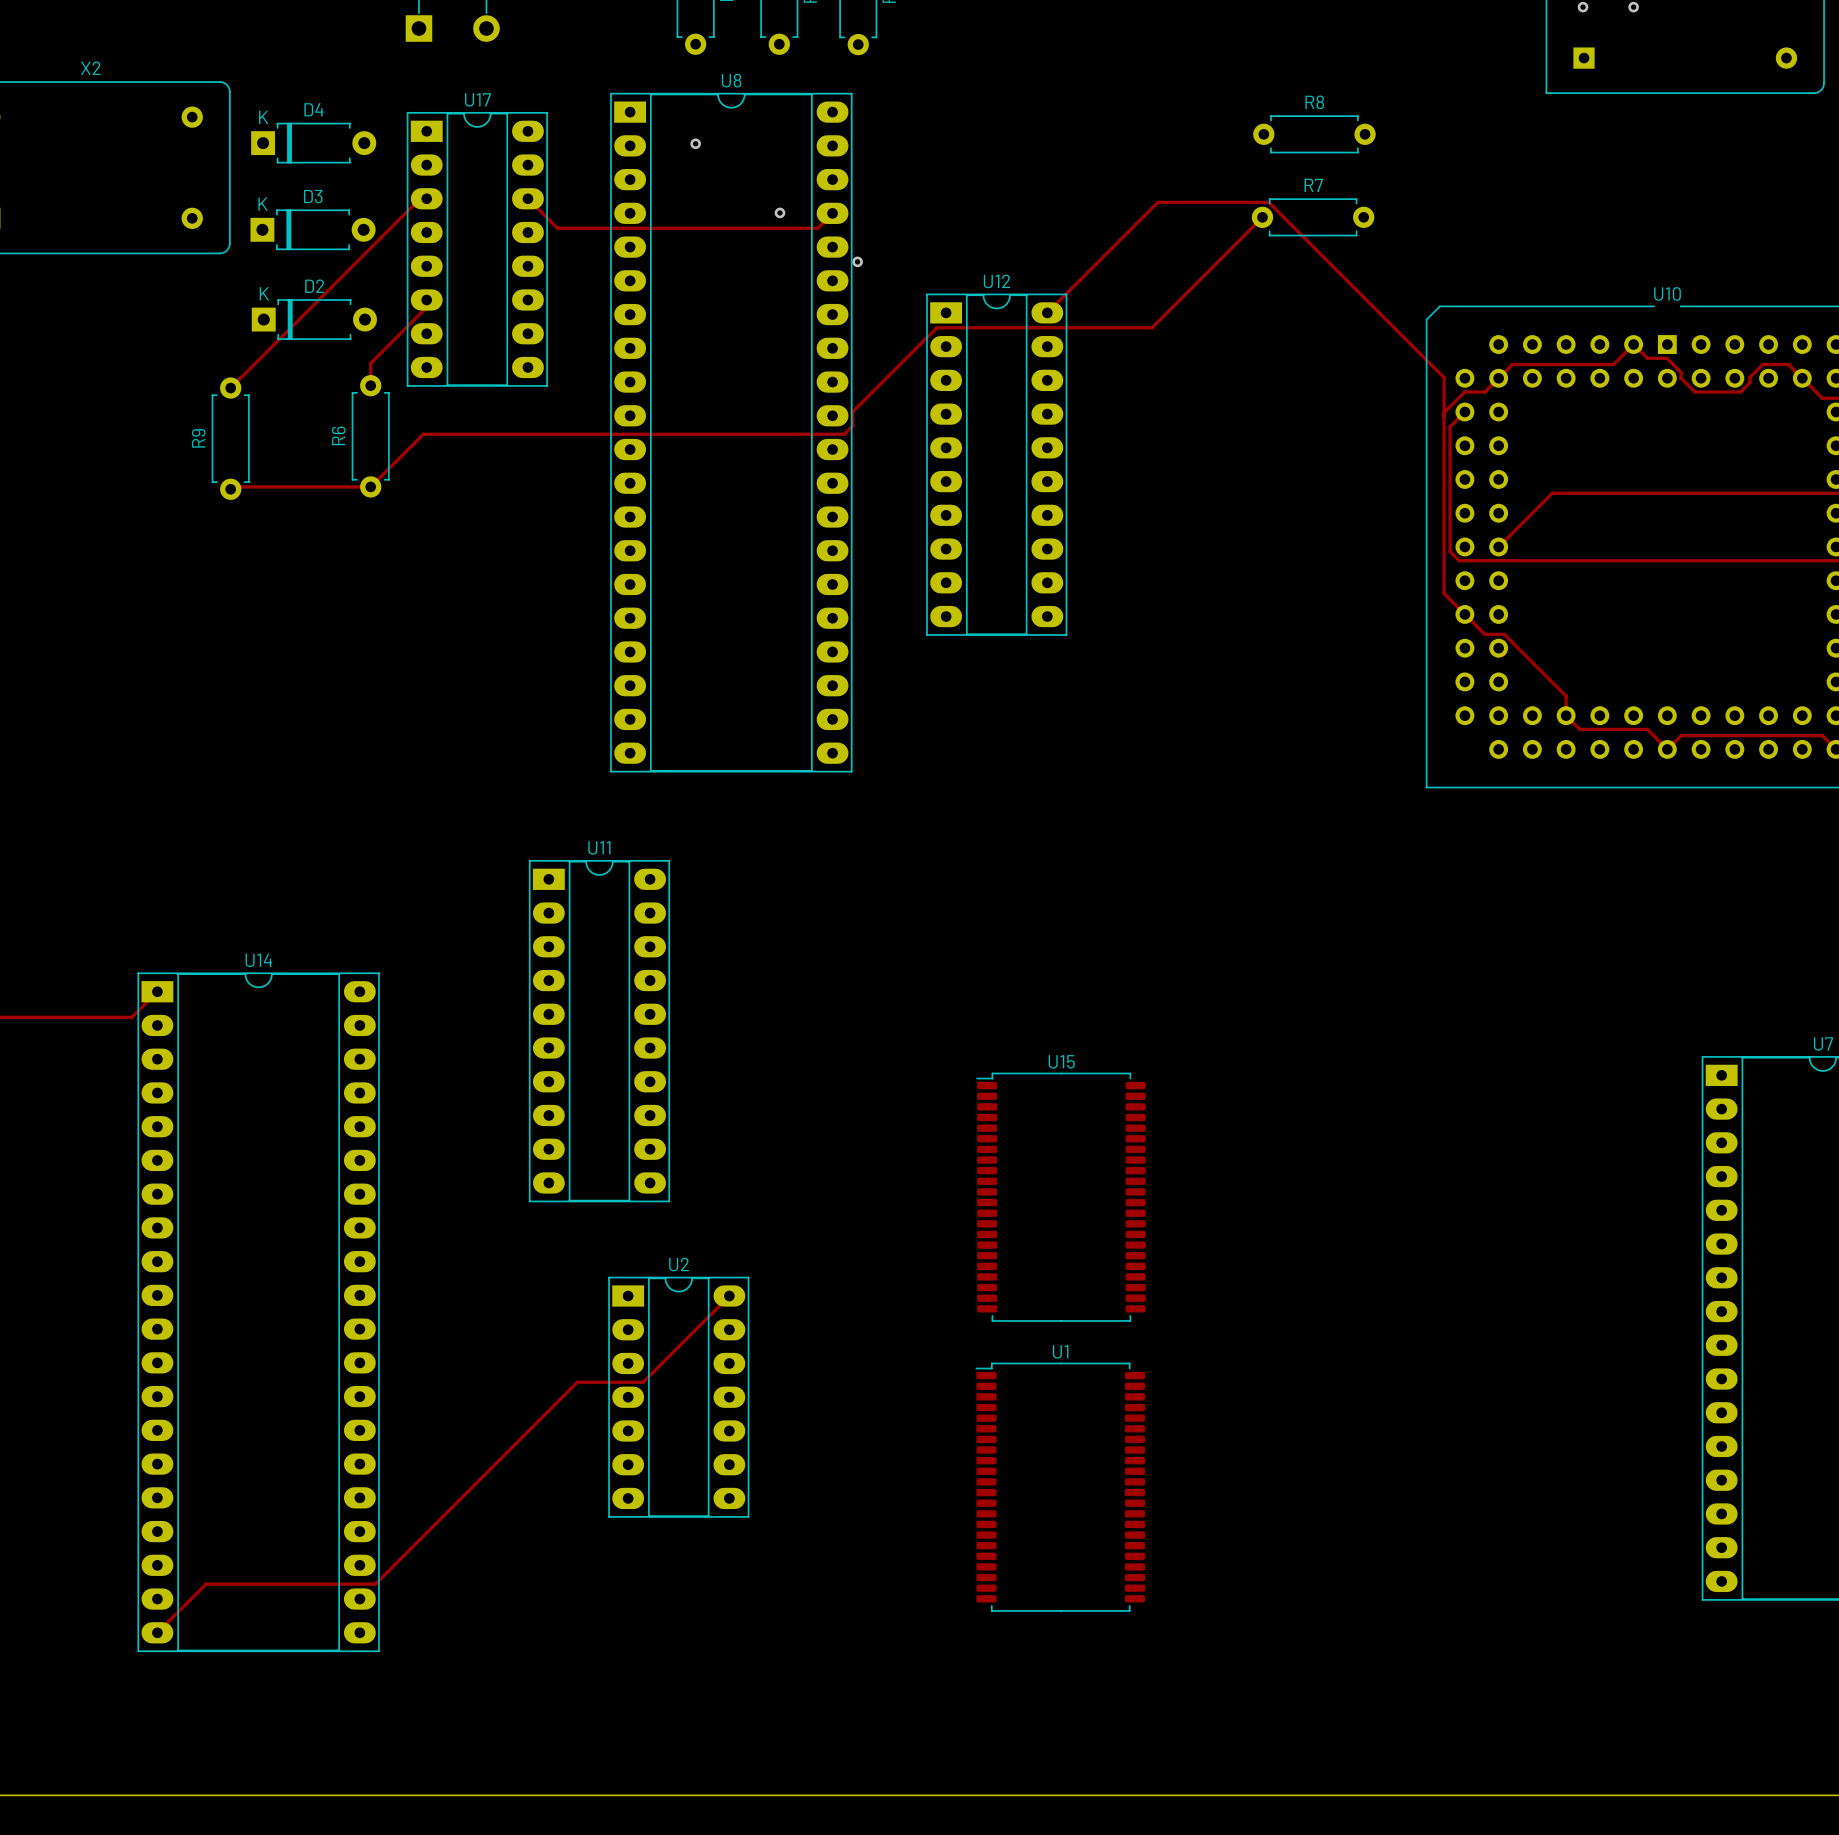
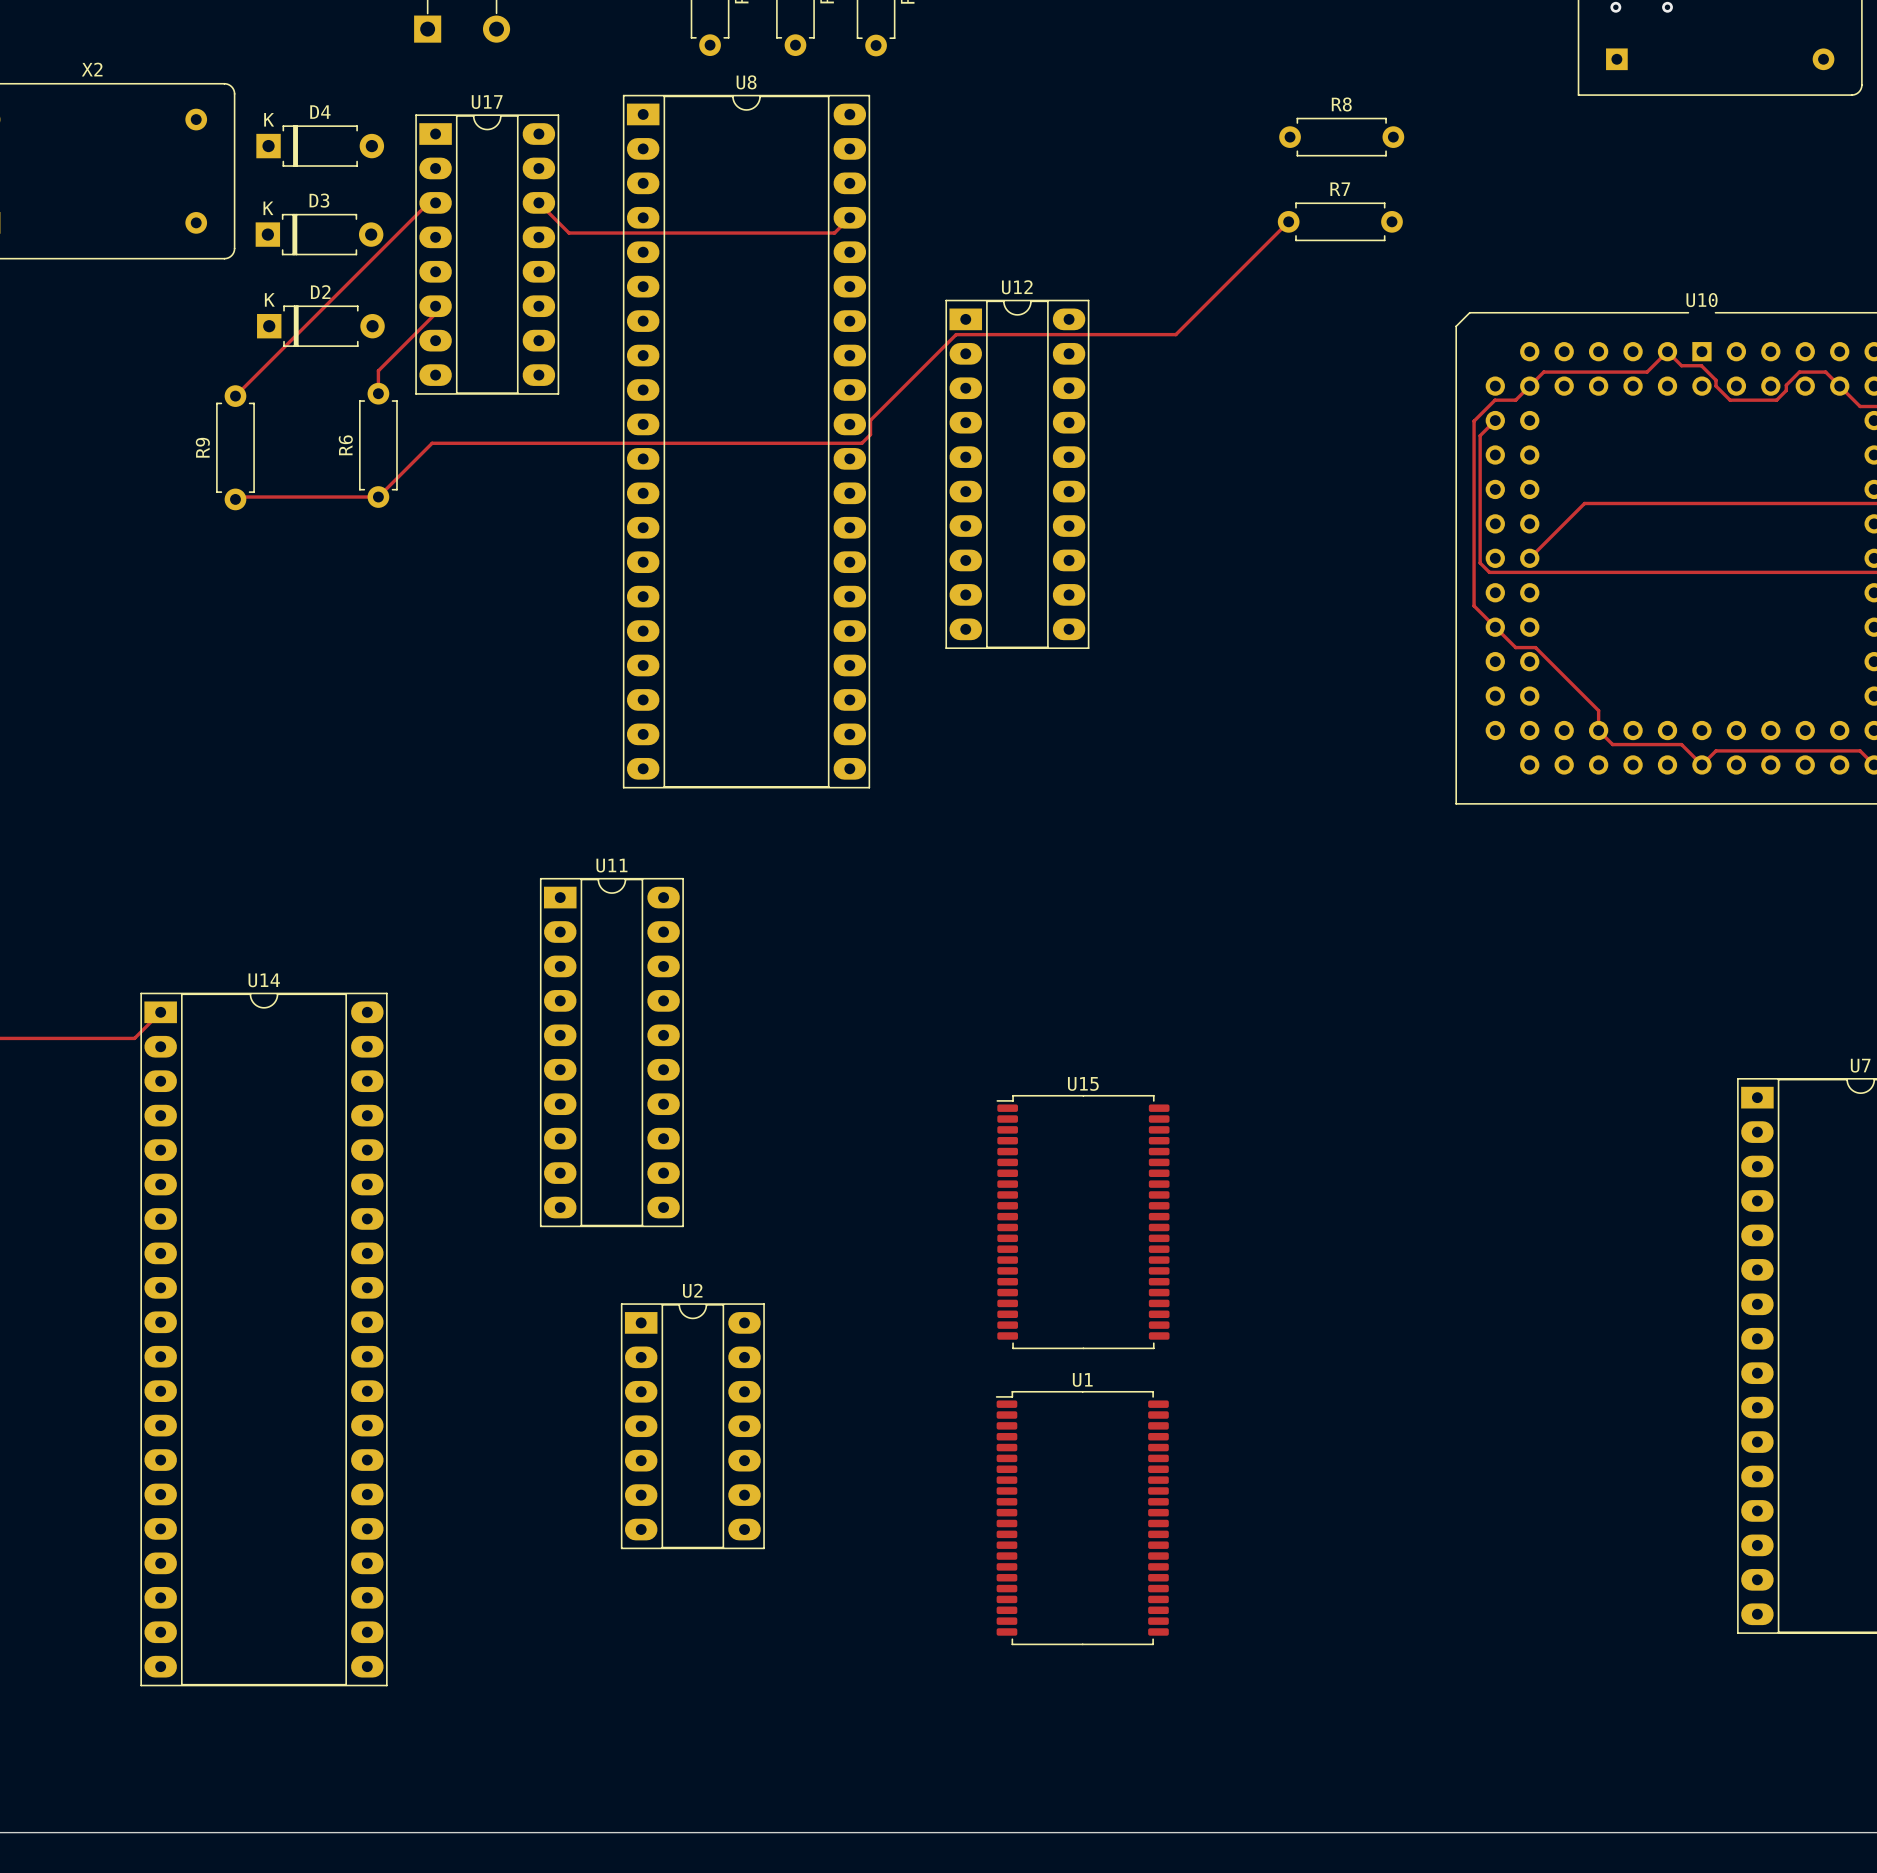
via: (695, 143) -> none
via: (779, 212) -> none
via: (857, 261) -> none
track: (1047, 312) (1157, 202) (1268, 202) (1444, 377) (1444, 412) -> none
track: (729, 1296) (643, 1382) (577, 1382) (375, 1584) (206, 1584) (157, 1632) -> none

